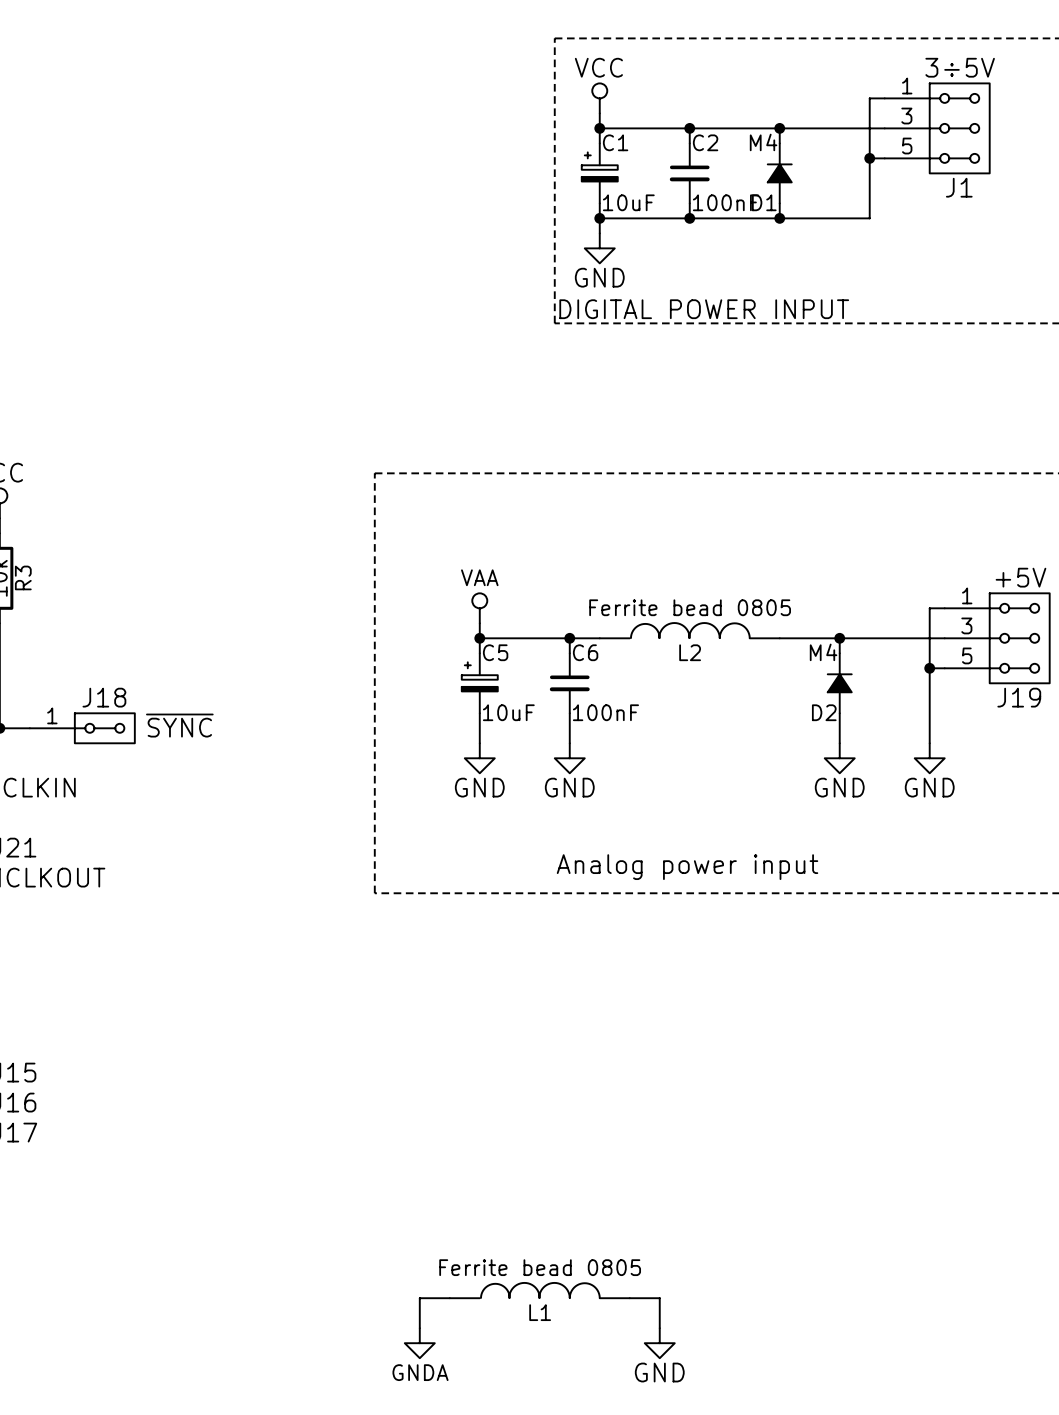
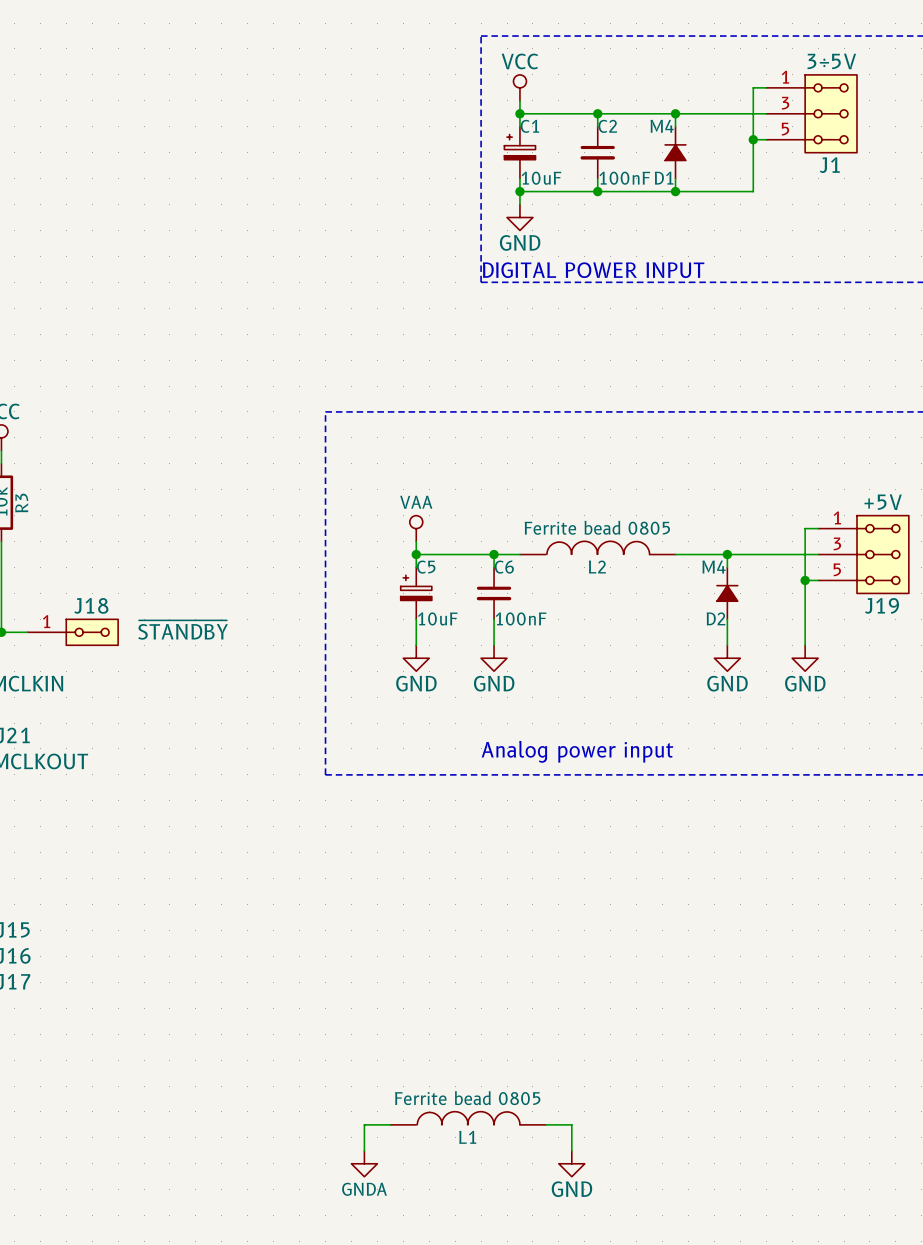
J18 value: ~{SYNC} (179, 725) -> ~{STANDBY} (183, 630)

